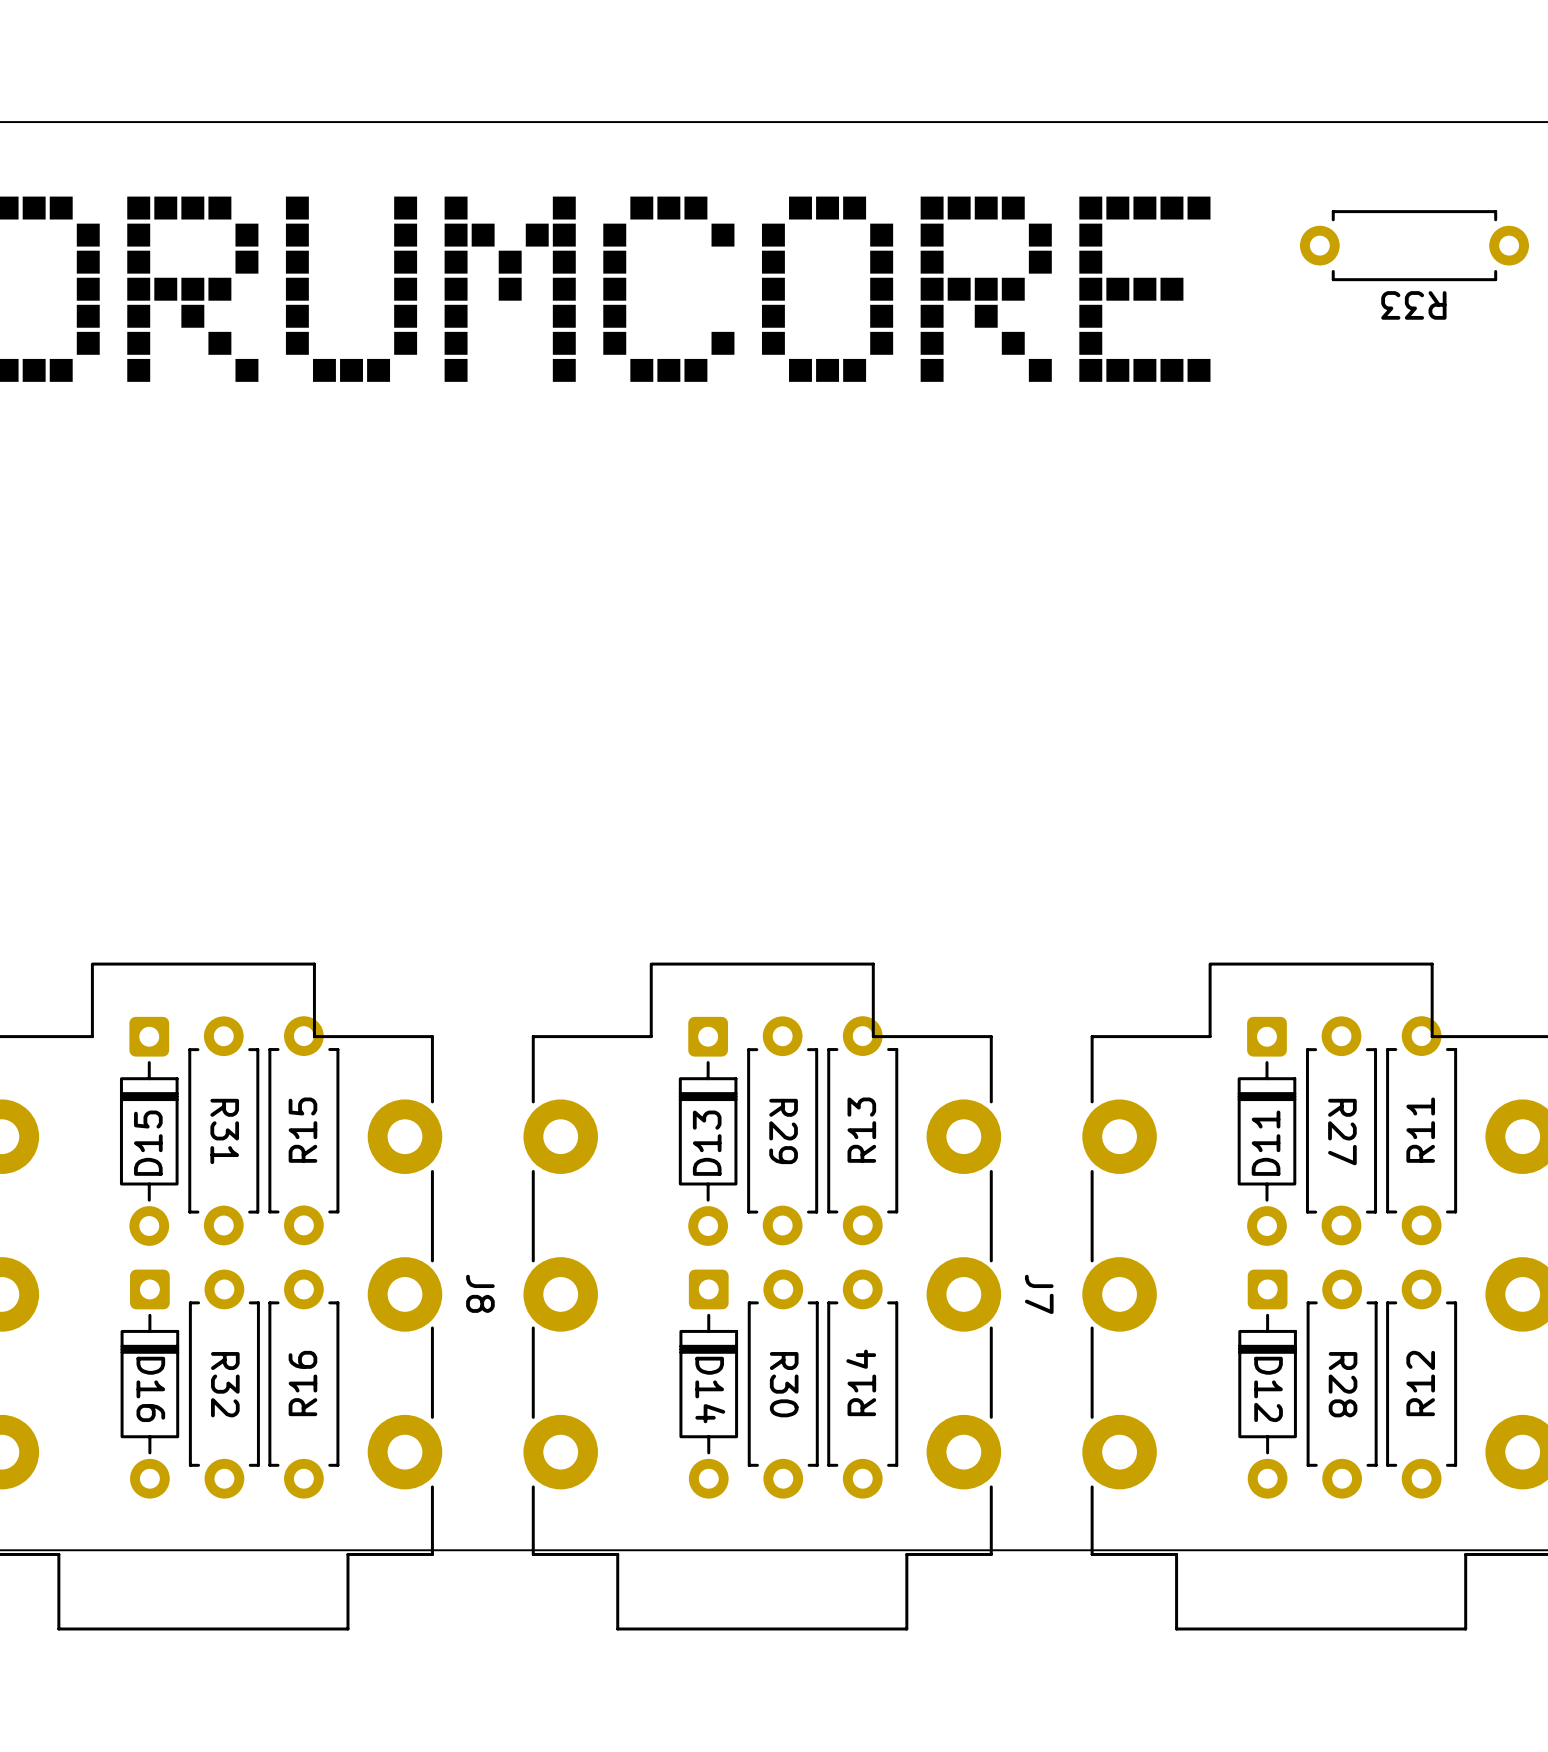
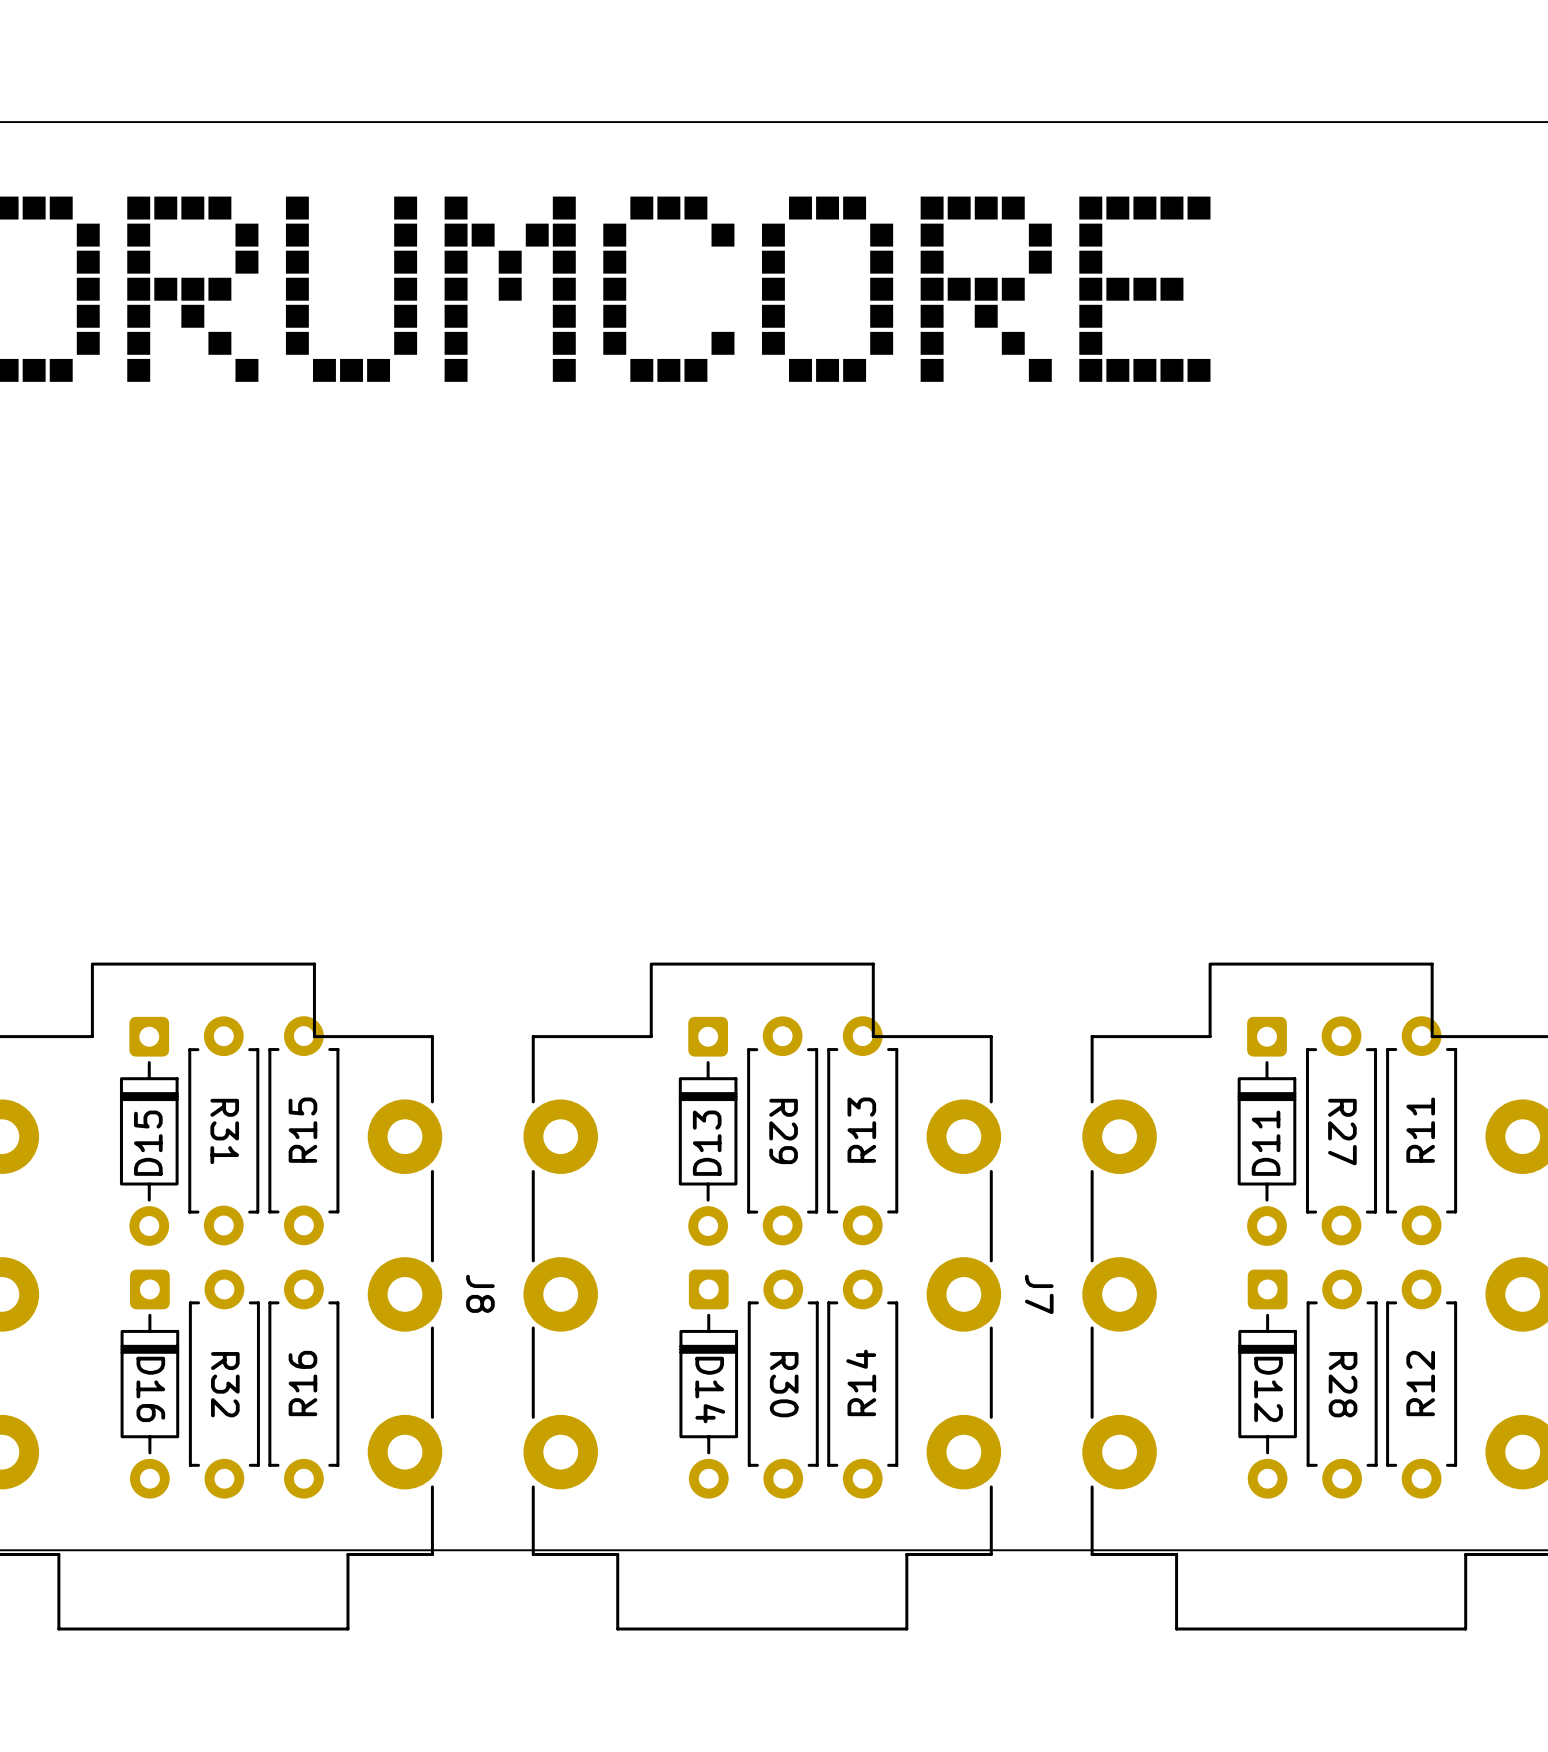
R33: (1414, 245) -> none

